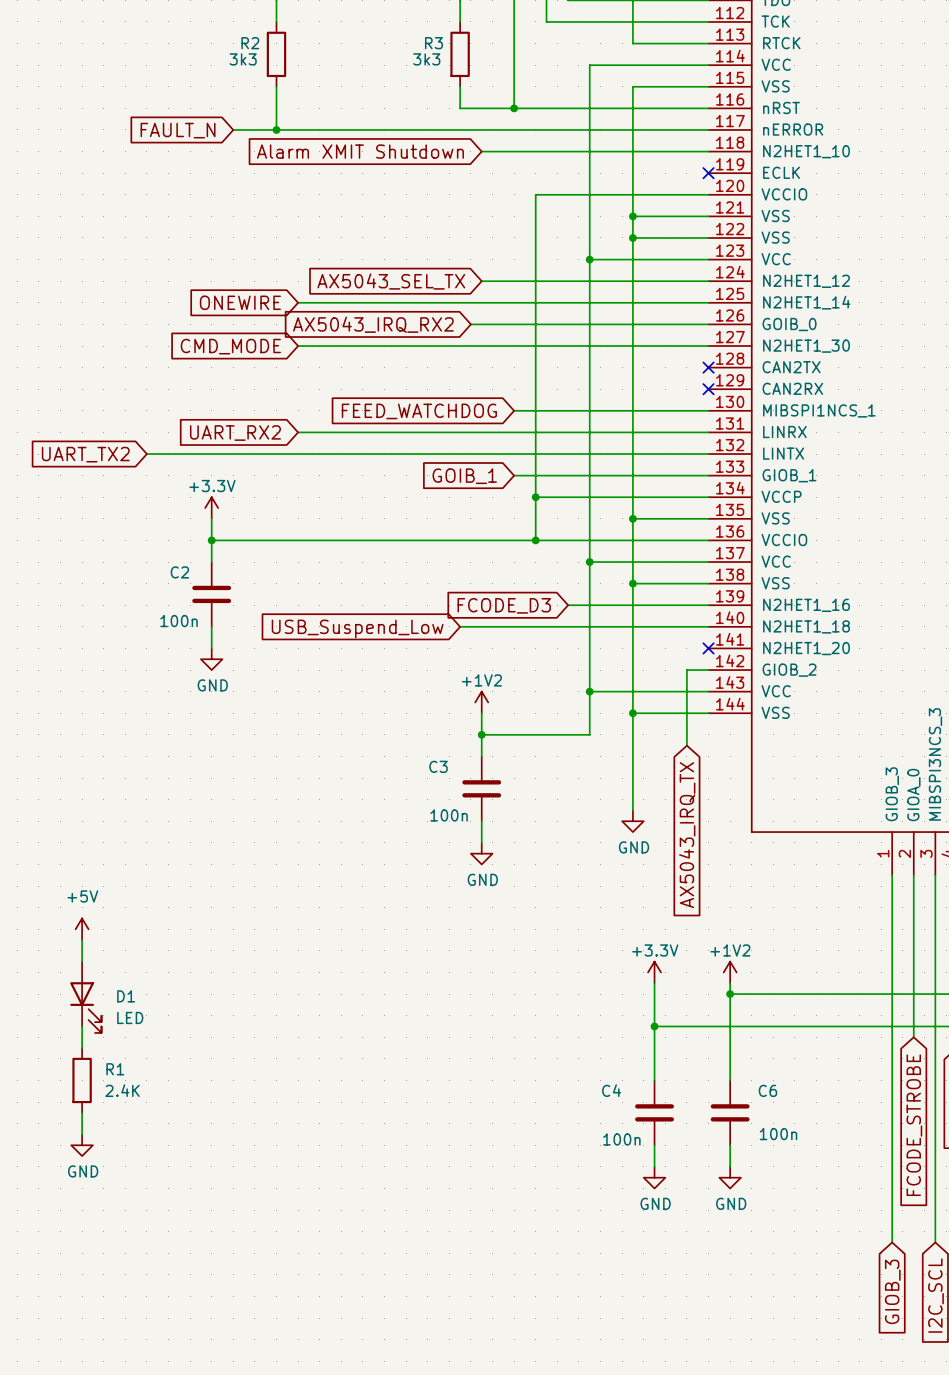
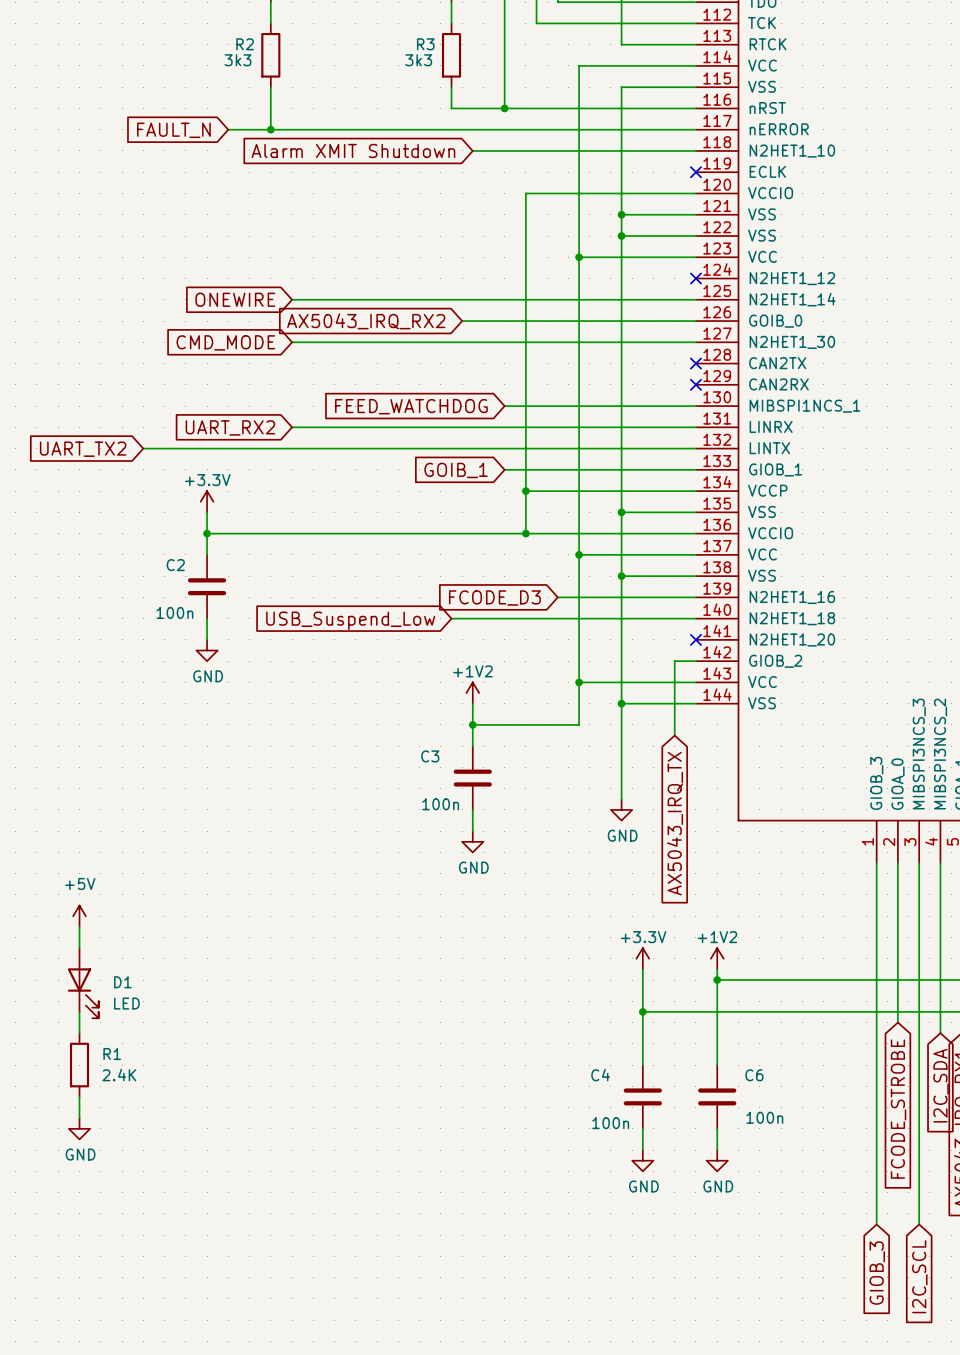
global label: AX5043_SEL_TX (391, 281) -> none
wire: (481, 281) (708, 281) -> none
no-connect mark: none -> (695, 278)

